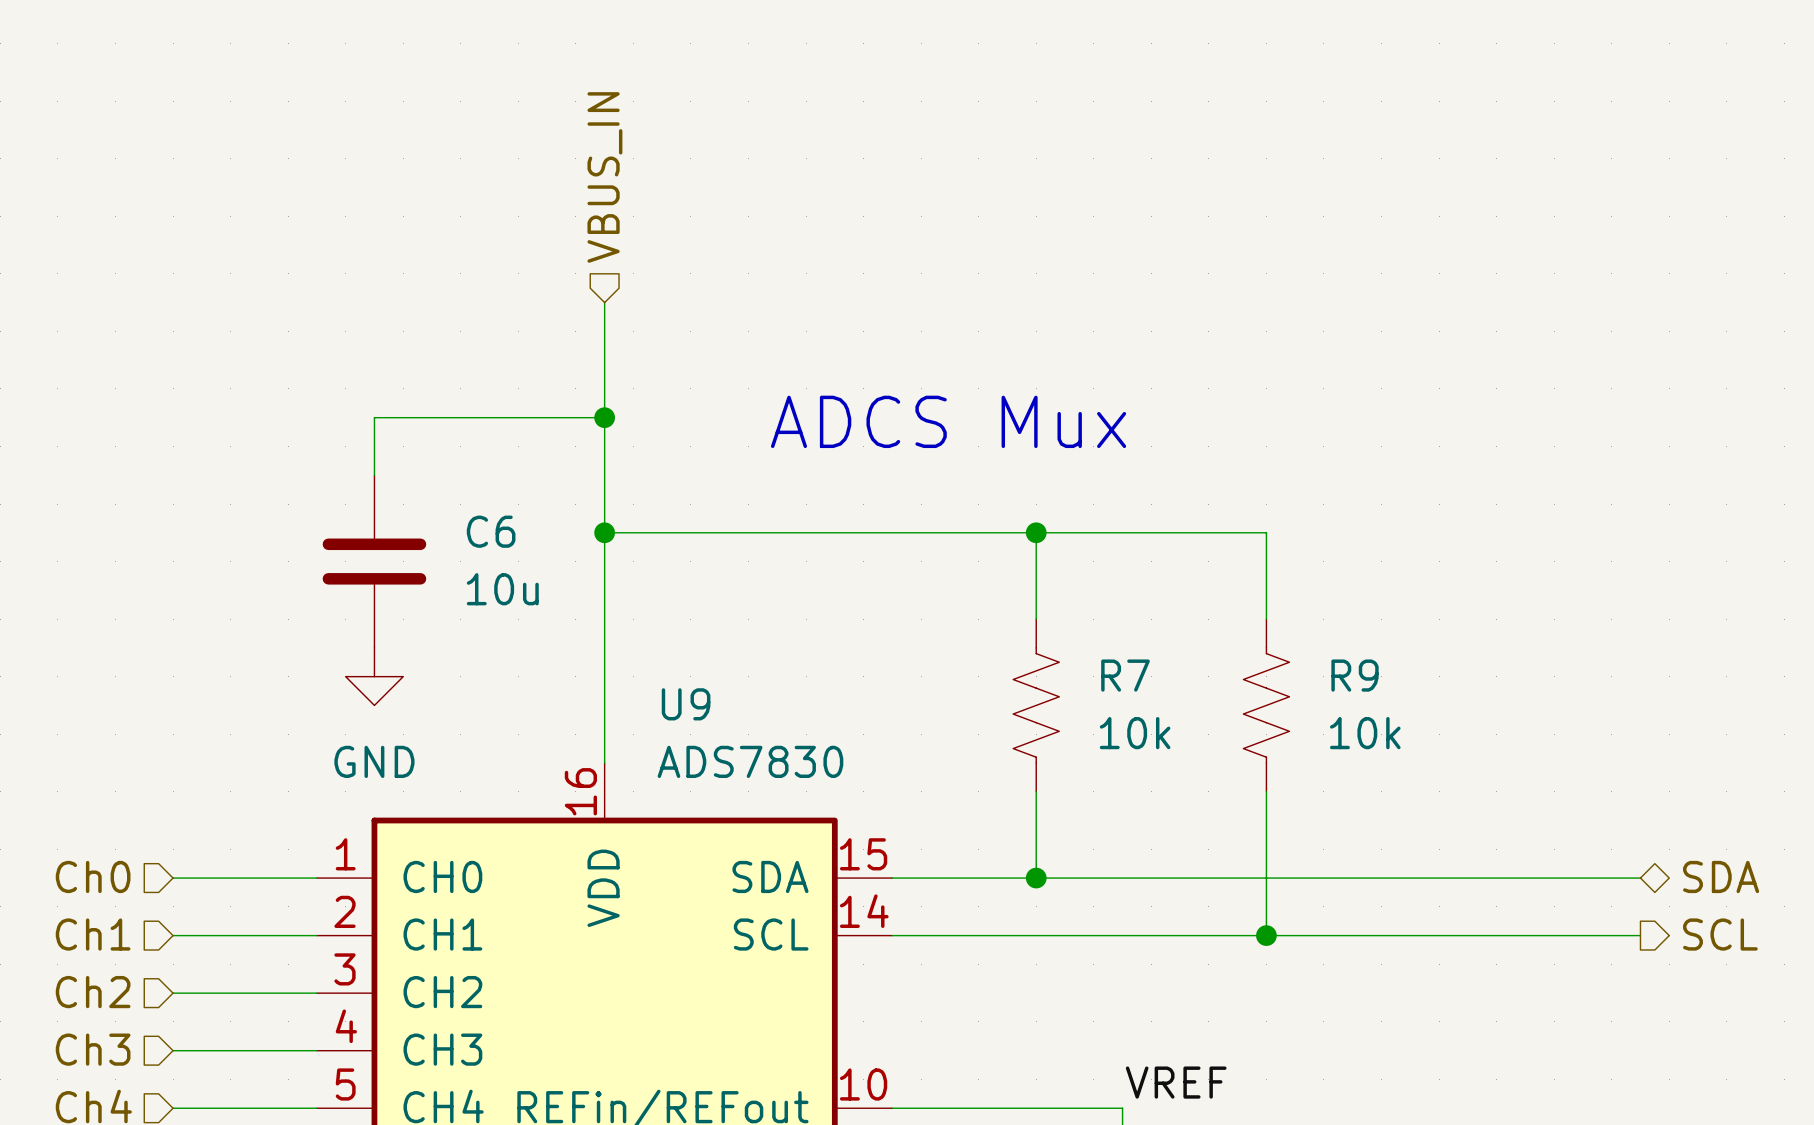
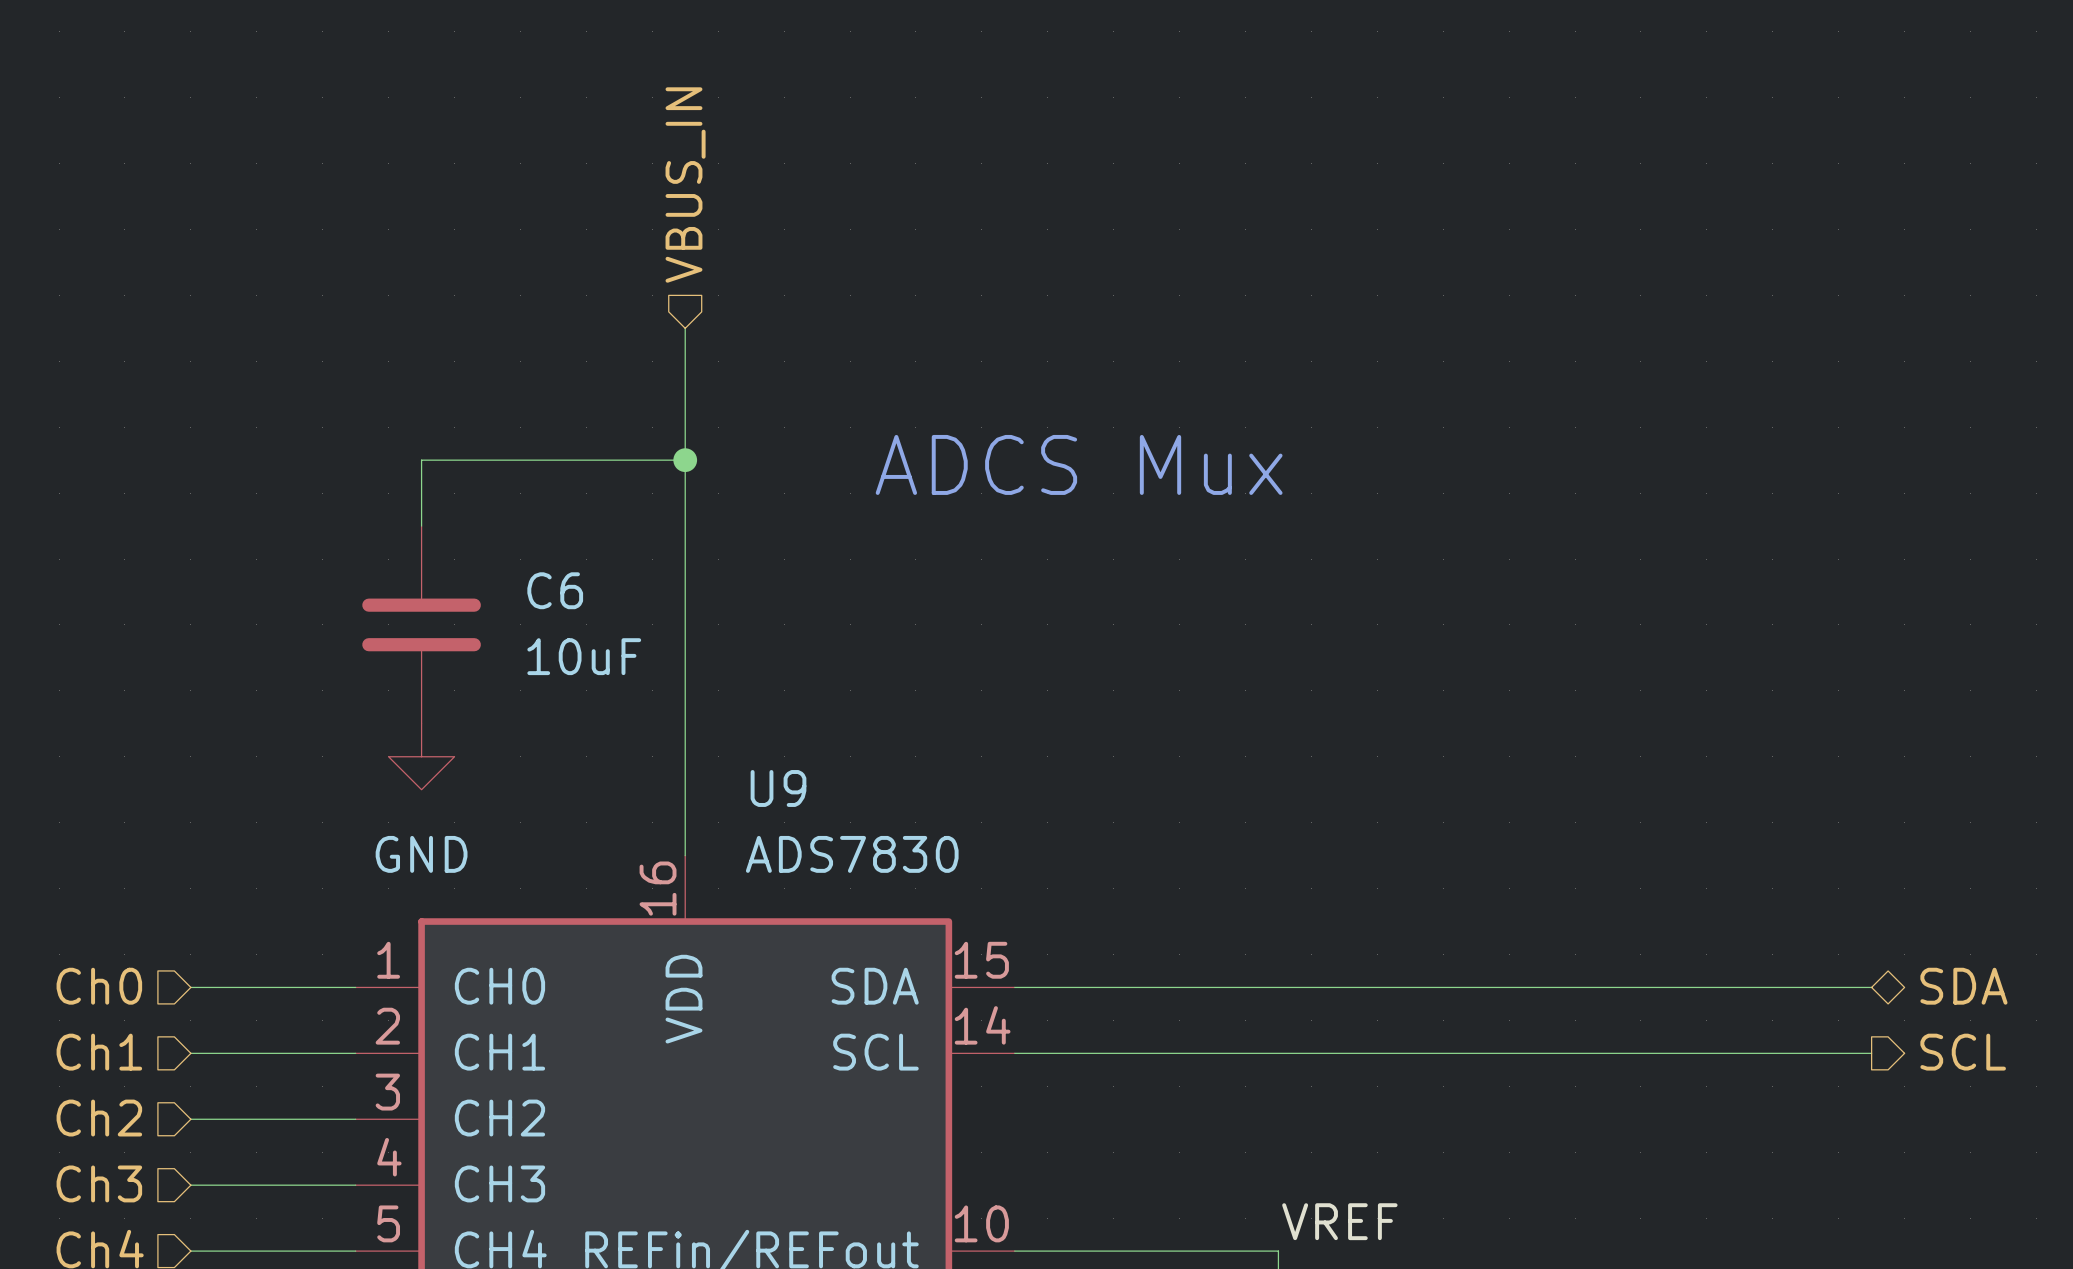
wire: (604, 532) (1266, 532) (1266, 619) -> none
junction: (604, 532) -> none
wire: (1036, 532) (1036, 619) -> none
junction: (1036, 532) -> none
C6 value: 10u (502, 589) -> 10uF (584, 656)
R7: 10k (1036, 705) -> none
R9: 10k (1266, 705) -> none
wire: (1036, 791) (1036, 878) -> none
wire: (1266, 791) (1266, 935) -> none
junction: (1036, 878) -> none
junction: (1266, 935) -> none

